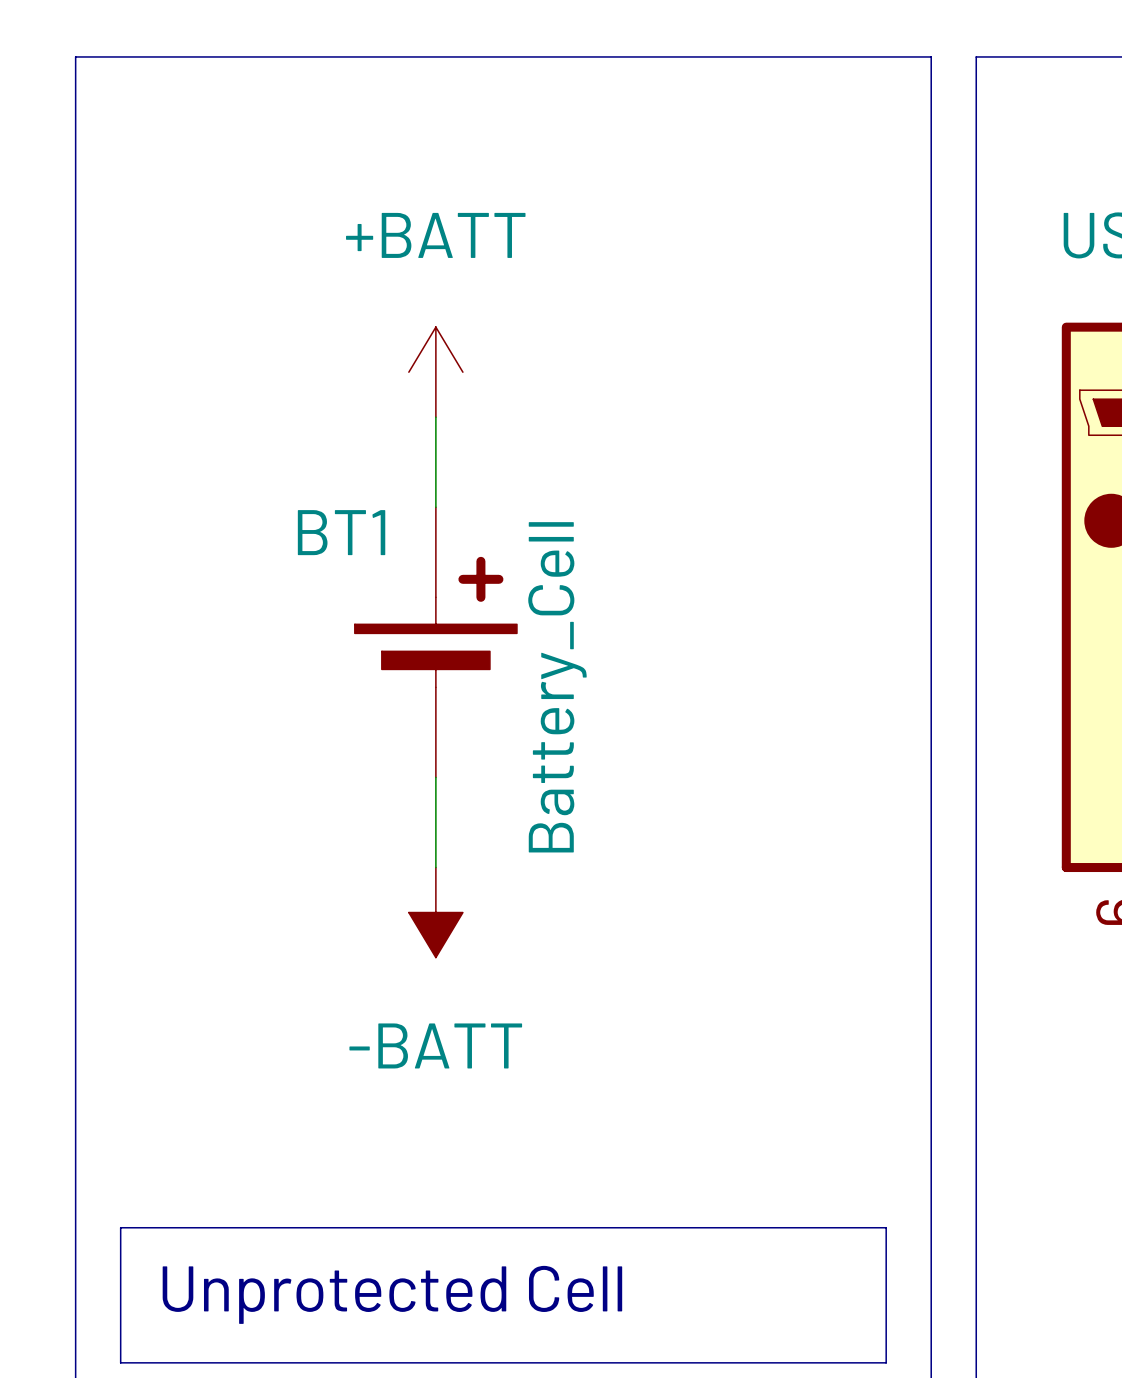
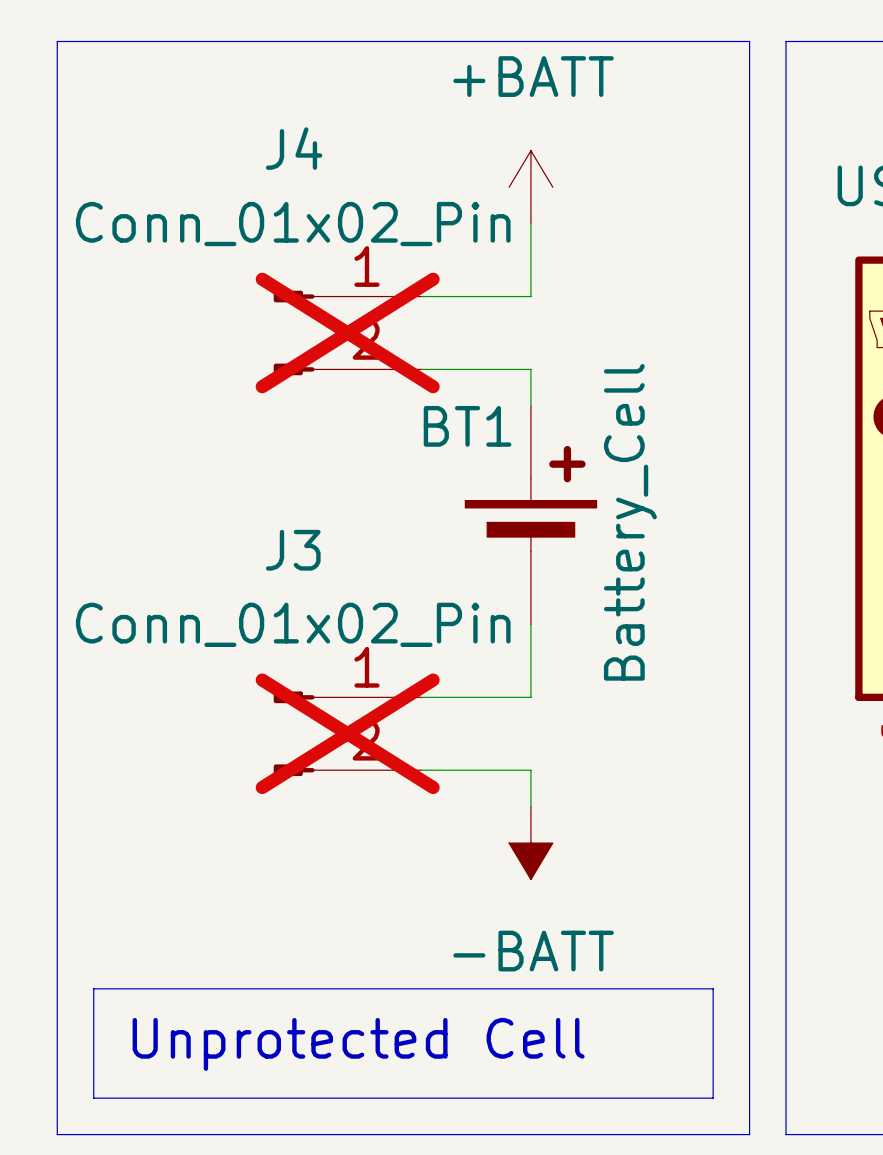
wire: none -> (530, 223) (530, 296) (421, 296)
power symbol position: +BATT (435, 372) -> +BATT (530, 187)
J4: none -> Conn_01x02_Pin (347, 332)
wire: (435, 417) (435, 507) -> none
wire: none -> (421, 369) (530, 369) (530, 405)
BT1 position: (435, 642) -> (530, 515)
wire: (435, 777) (435, 867) -> none
wire: none -> (530, 624) (530, 697) (421, 697)
J3: none -> Conn_01x02_Pin (347, 733)
power symbol position: -BATT (435, 912) -> -BATT (530, 843)
wire: none -> (421, 770) (530, 770) (530, 806)

